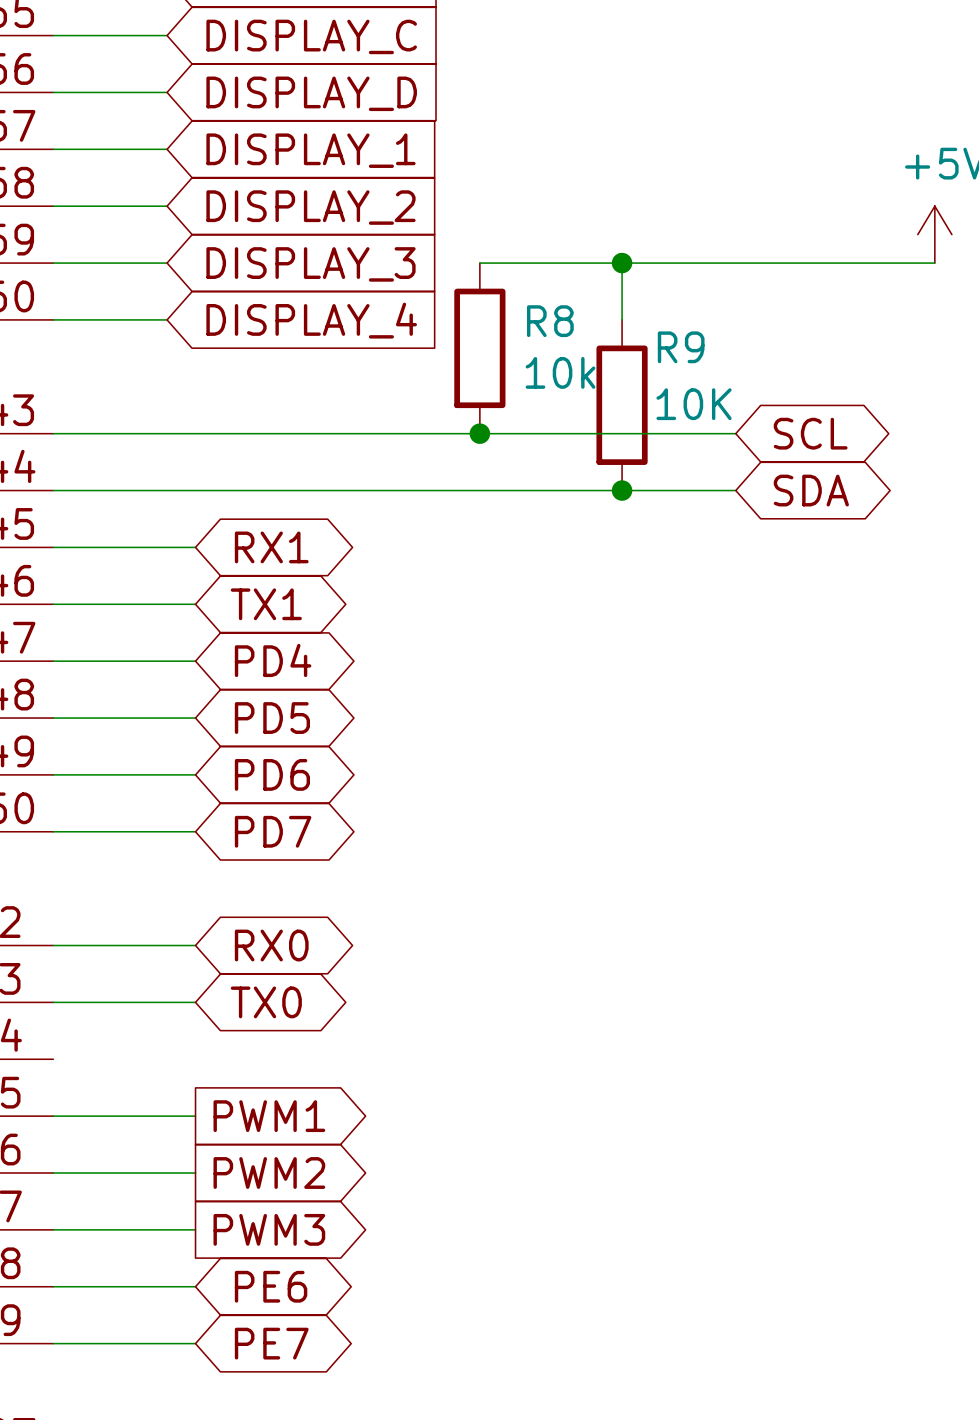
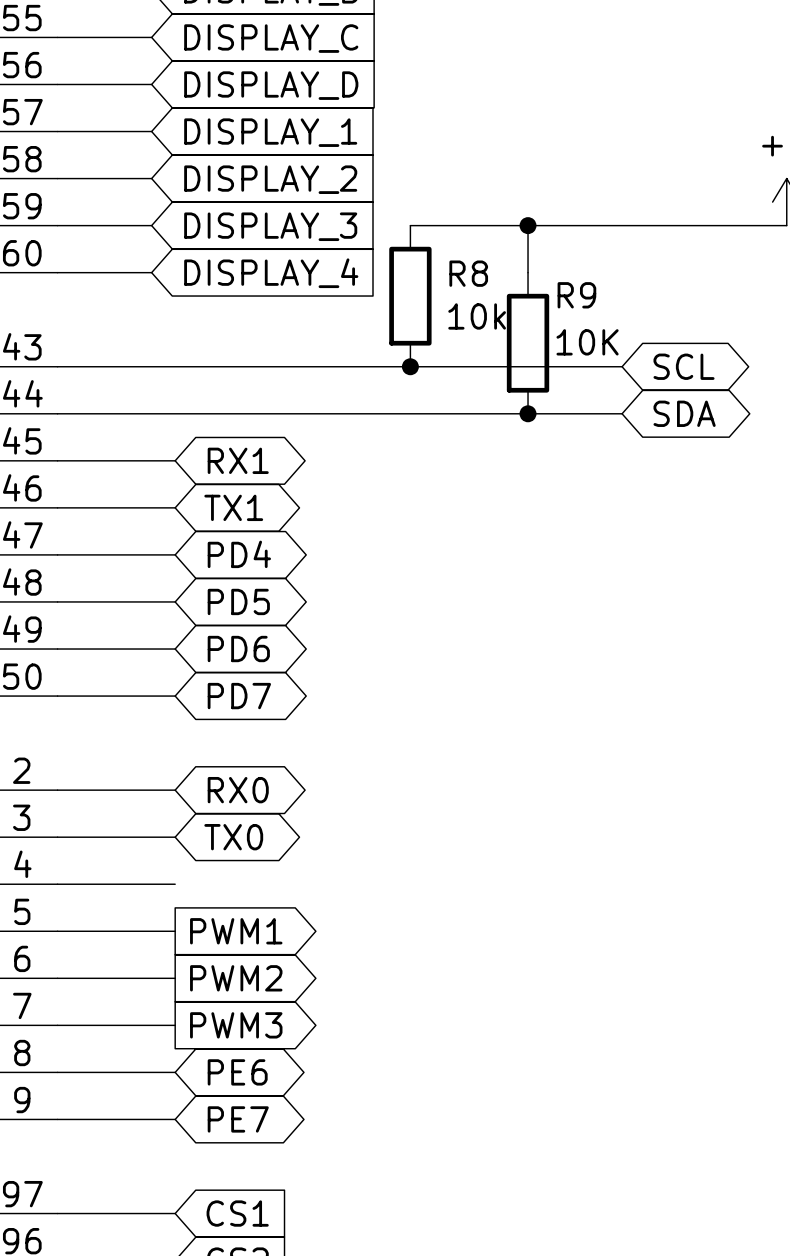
wire: none -> (57, 884) (175, 884)

